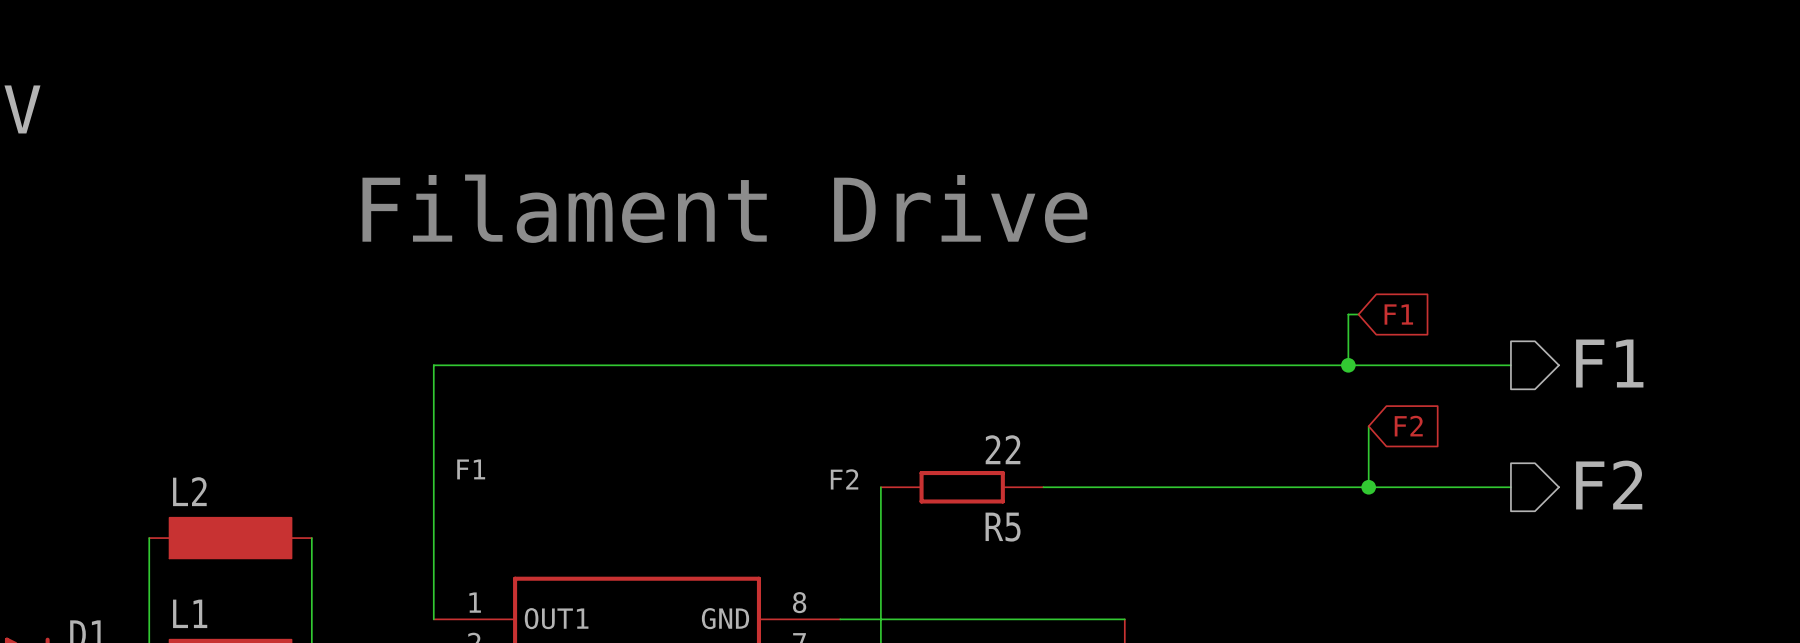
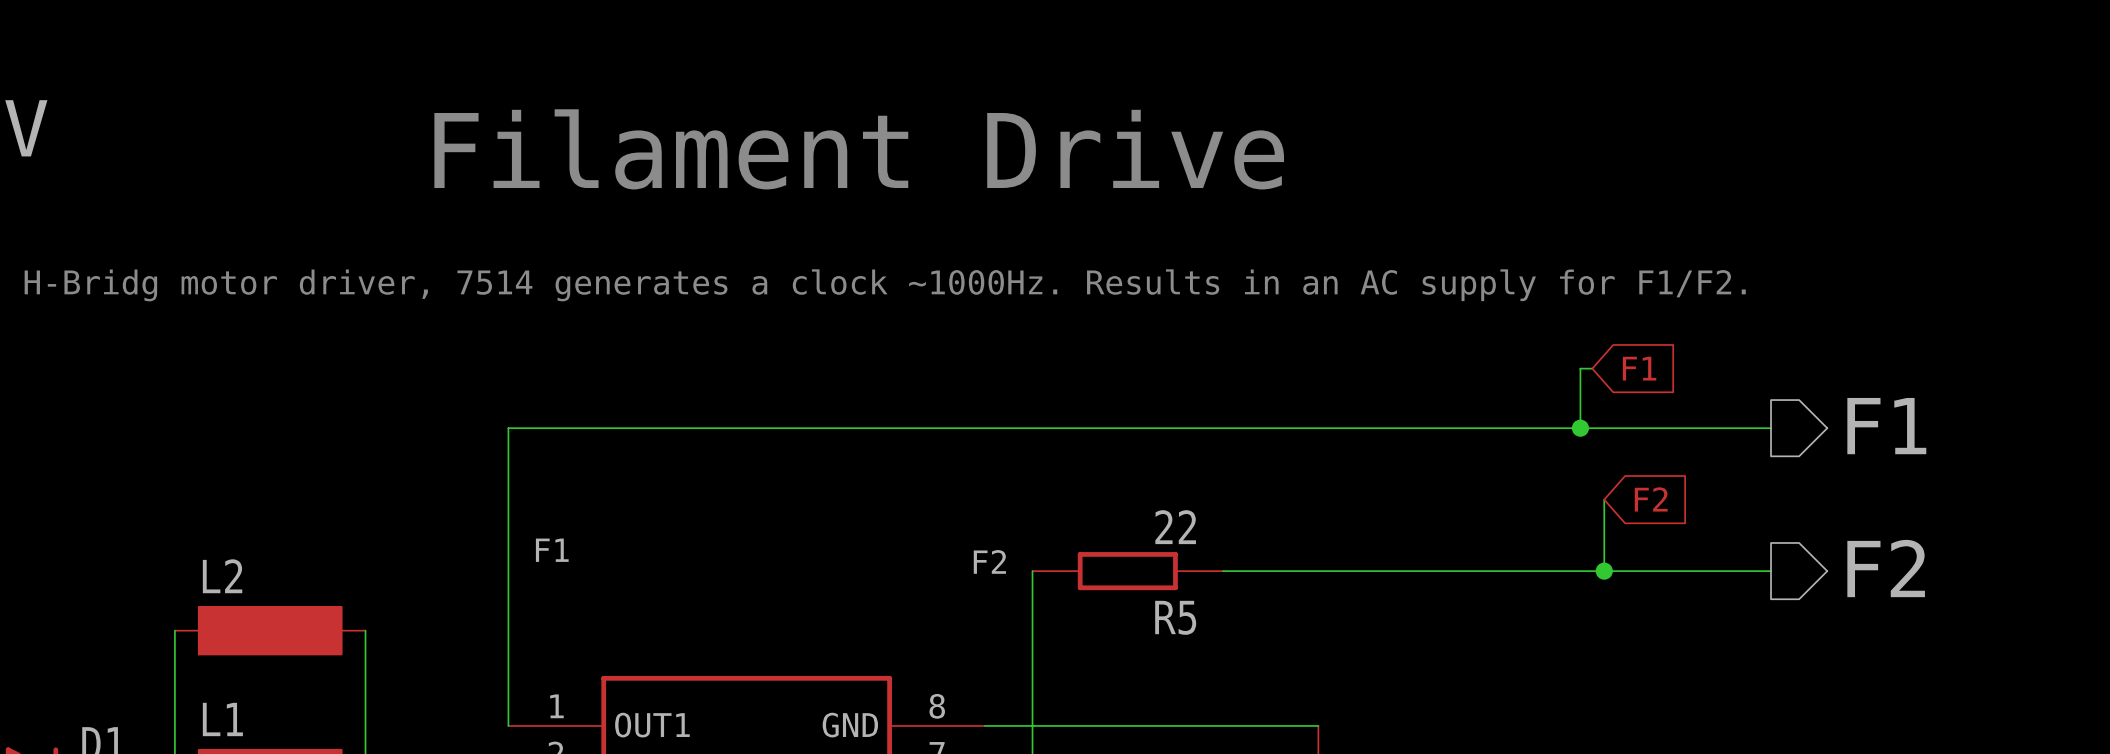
text position: Filament Drive (724, 208) -> Filament Drive (859, 149)
text: none -> H-Bridg motor driver, 7514 generates a clock ~1000Hz. Results in an AC supply for F1/F2. (885, 285)

